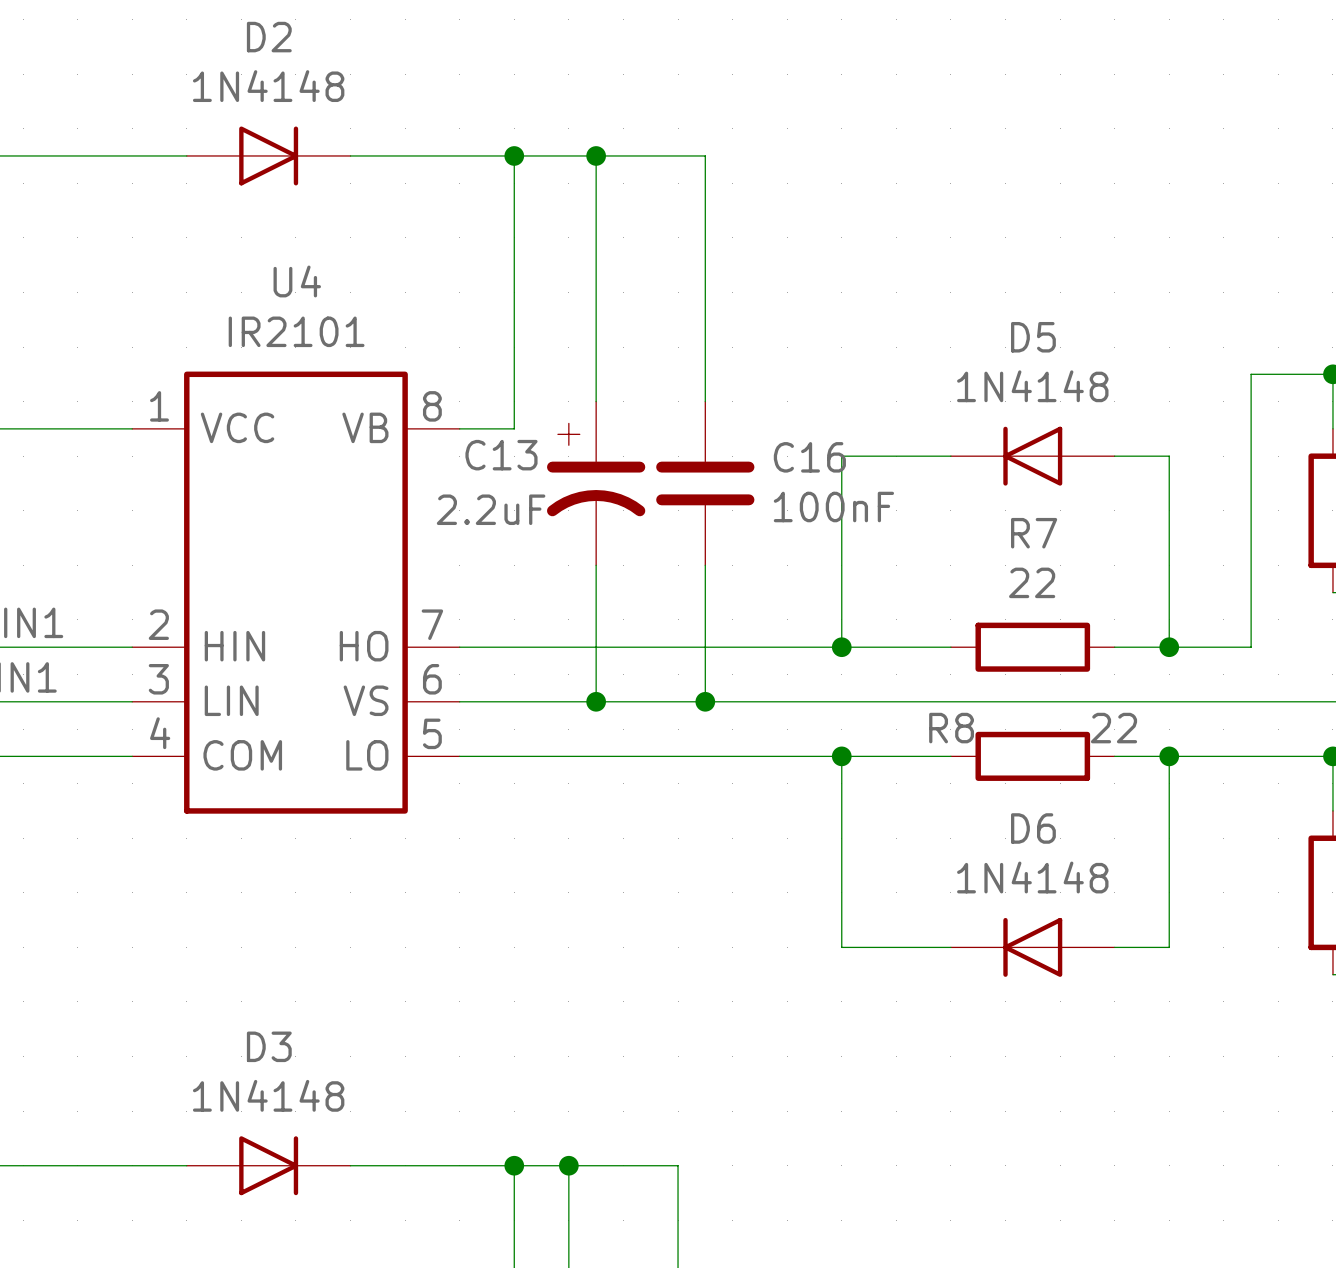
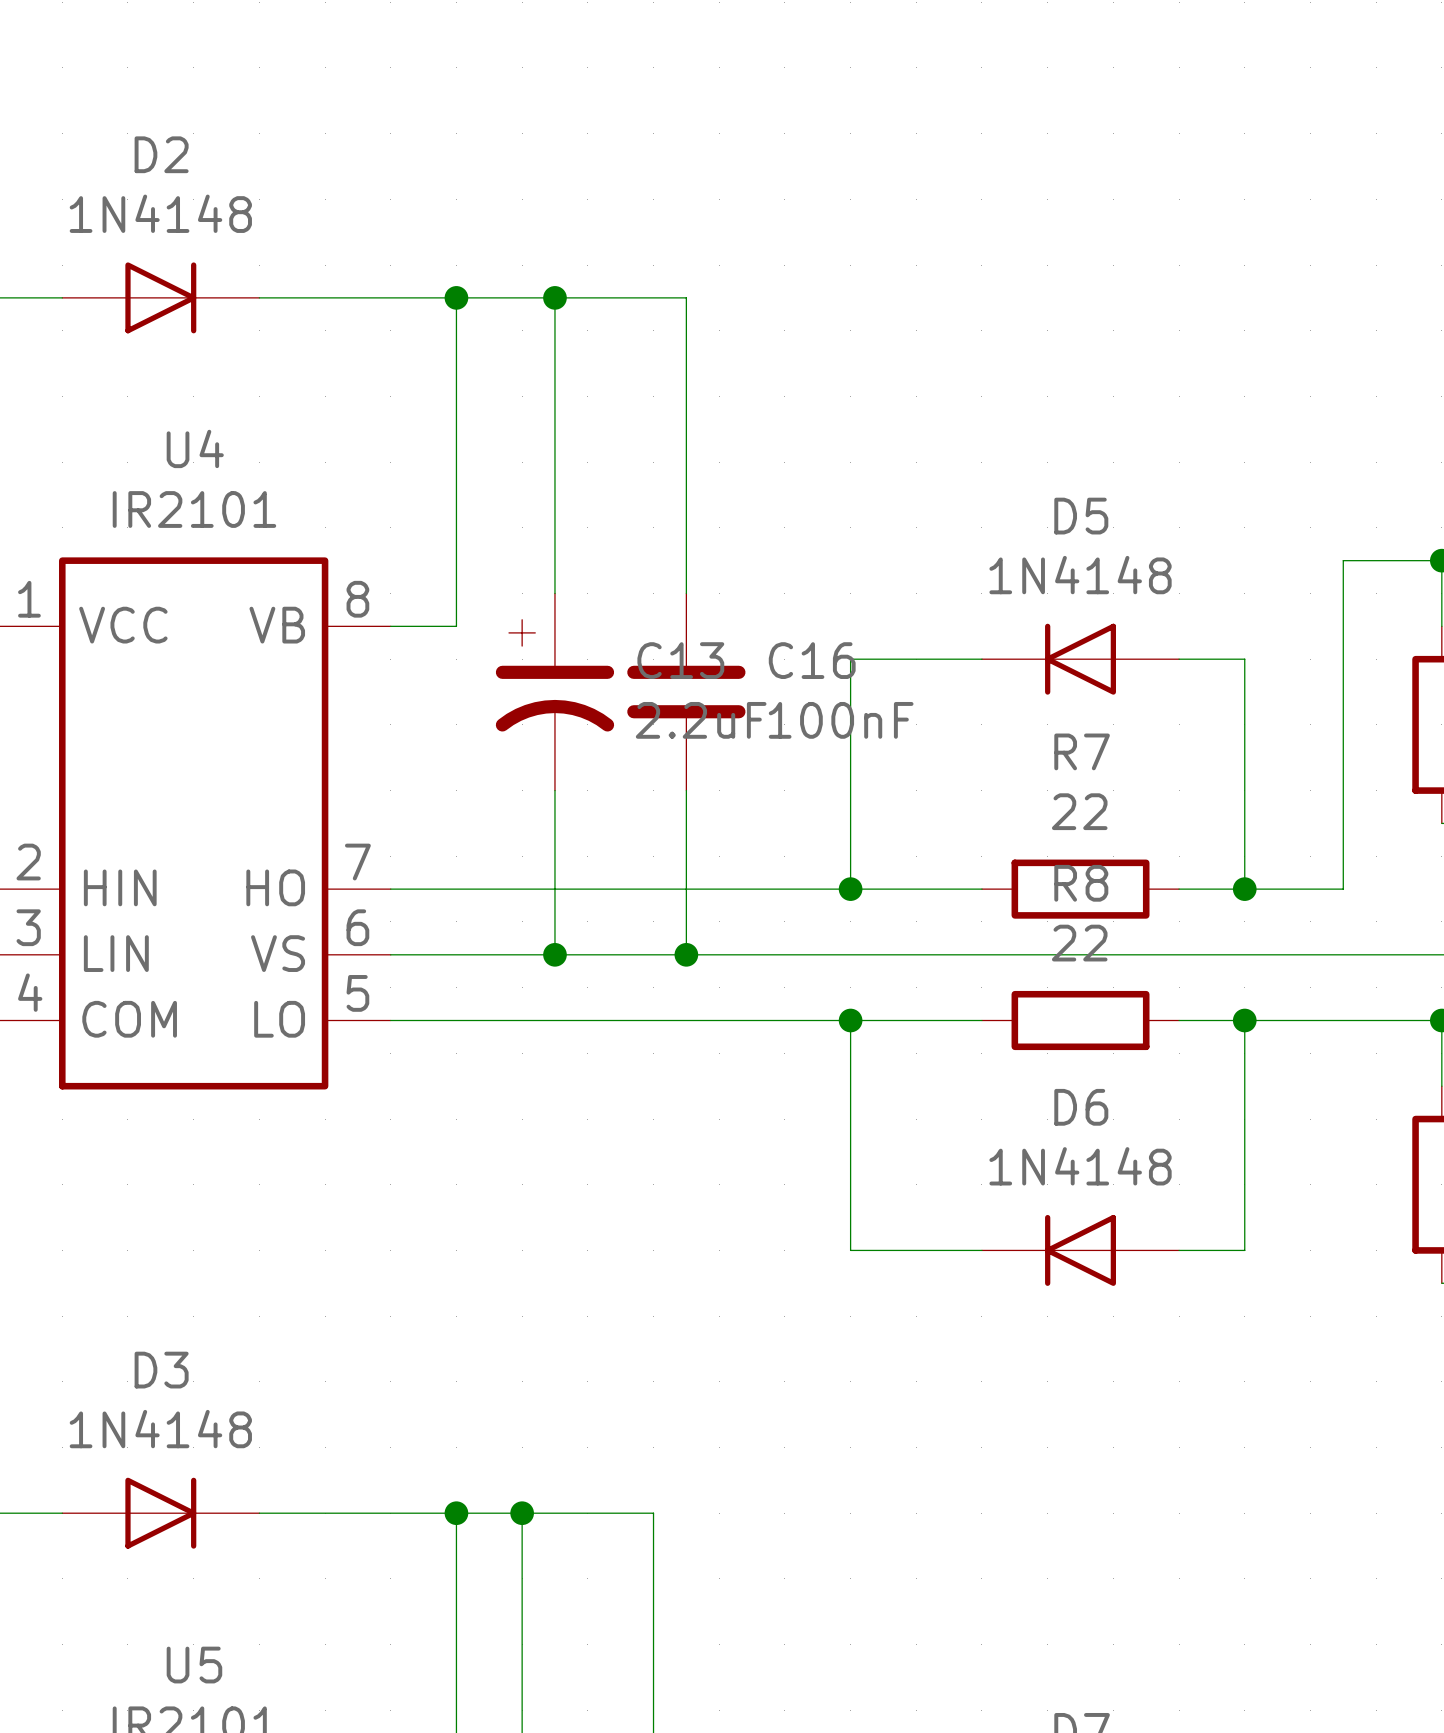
C13 name position: C13 (501, 455) -> C13 (680, 660)
C13 value position: 2.2uF (491, 509) -> 2.2uF (701, 720)
R8 name position: R8 (951, 728) -> R8 (1081, 883)
R8 value position: 22 (1114, 728) -> 22 (1079, 943)

